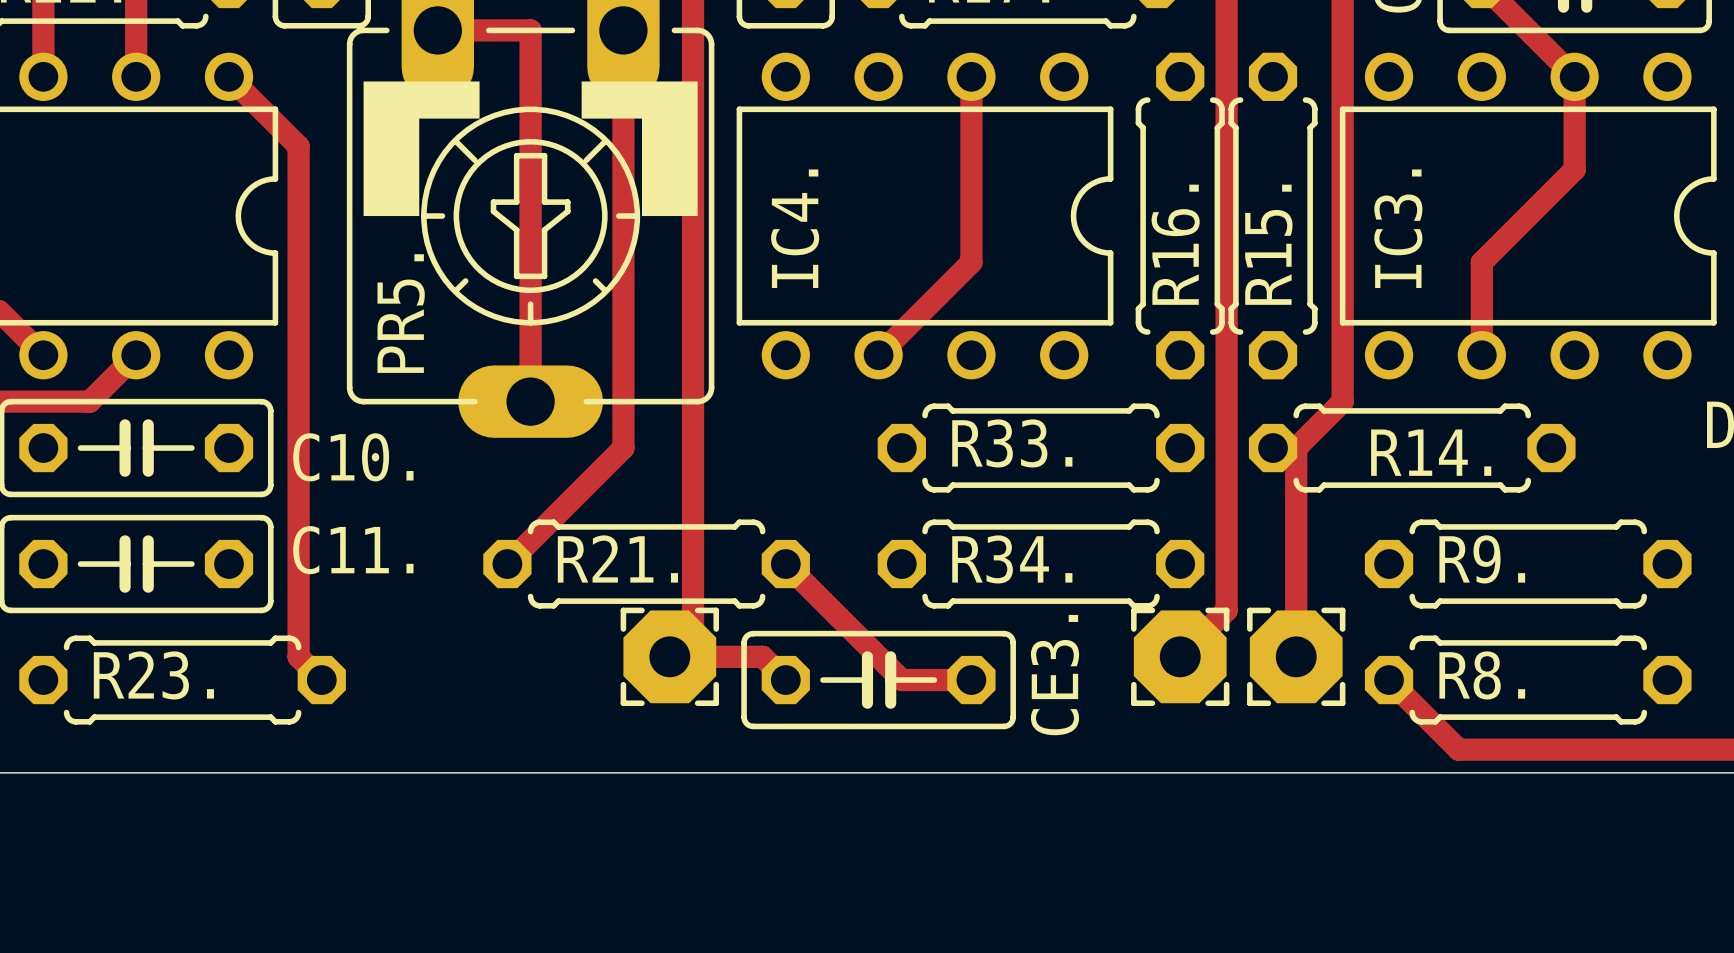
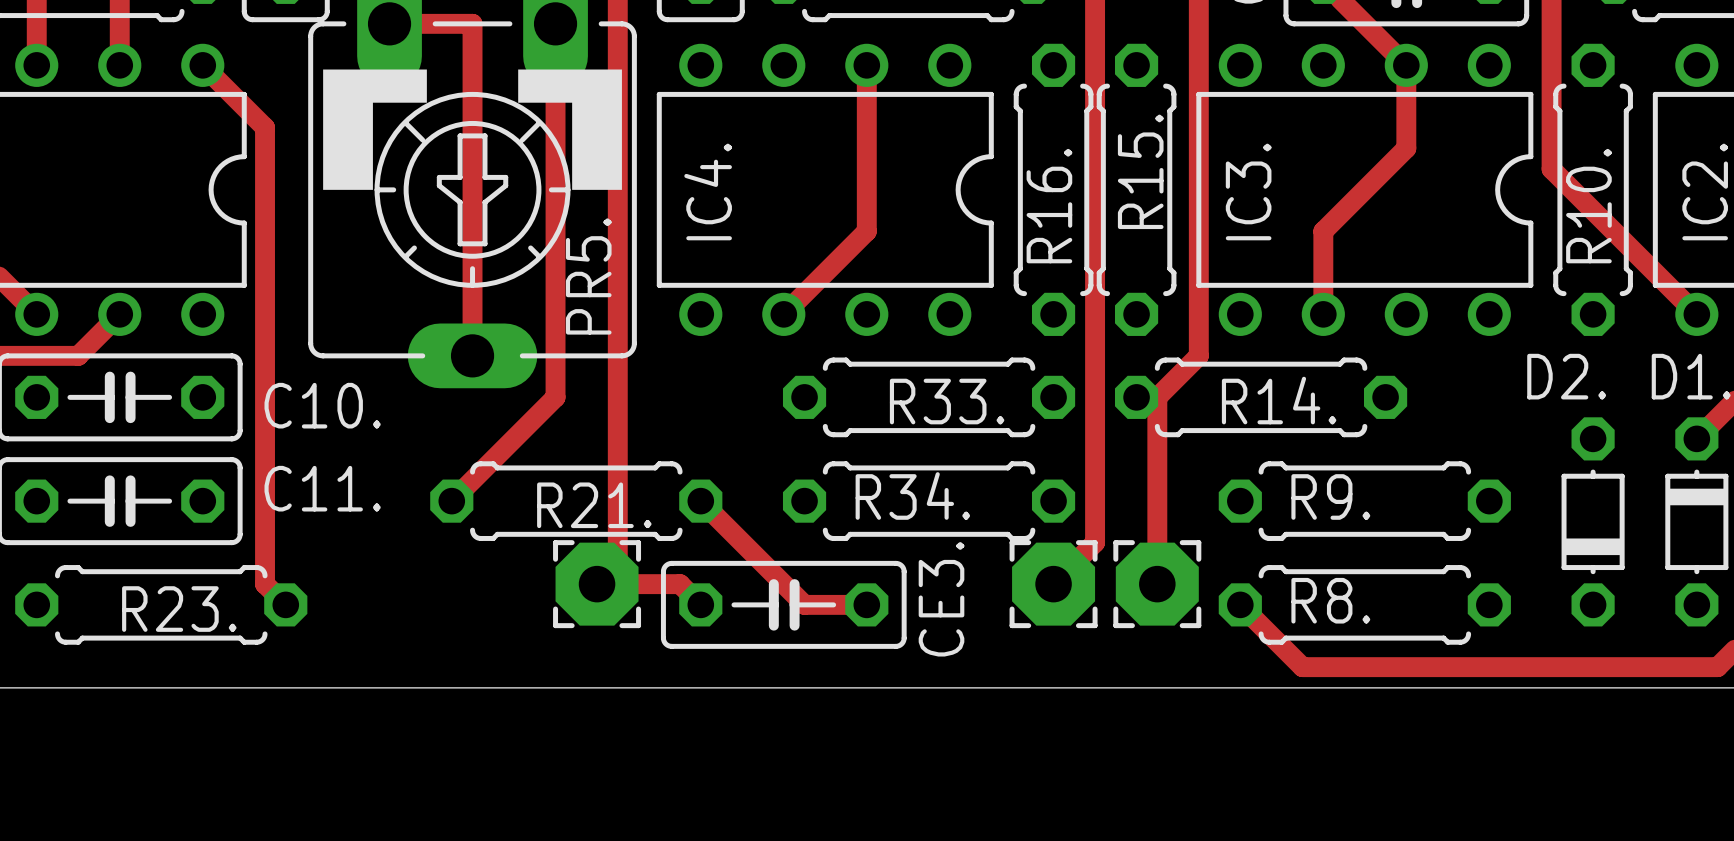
R15. name position: R15. (1268, 244) -> R15. (1140, 171)
PR5. name position: PR5. (401, 313) -> PR5. (588, 276)
R33. name position: R33. (1012, 443) -> R33. (947, 401)
R21. name position: R21. (617, 558) -> R21. (594, 505)
R23. name position: R23. (153, 675) -> R23. (179, 609)

